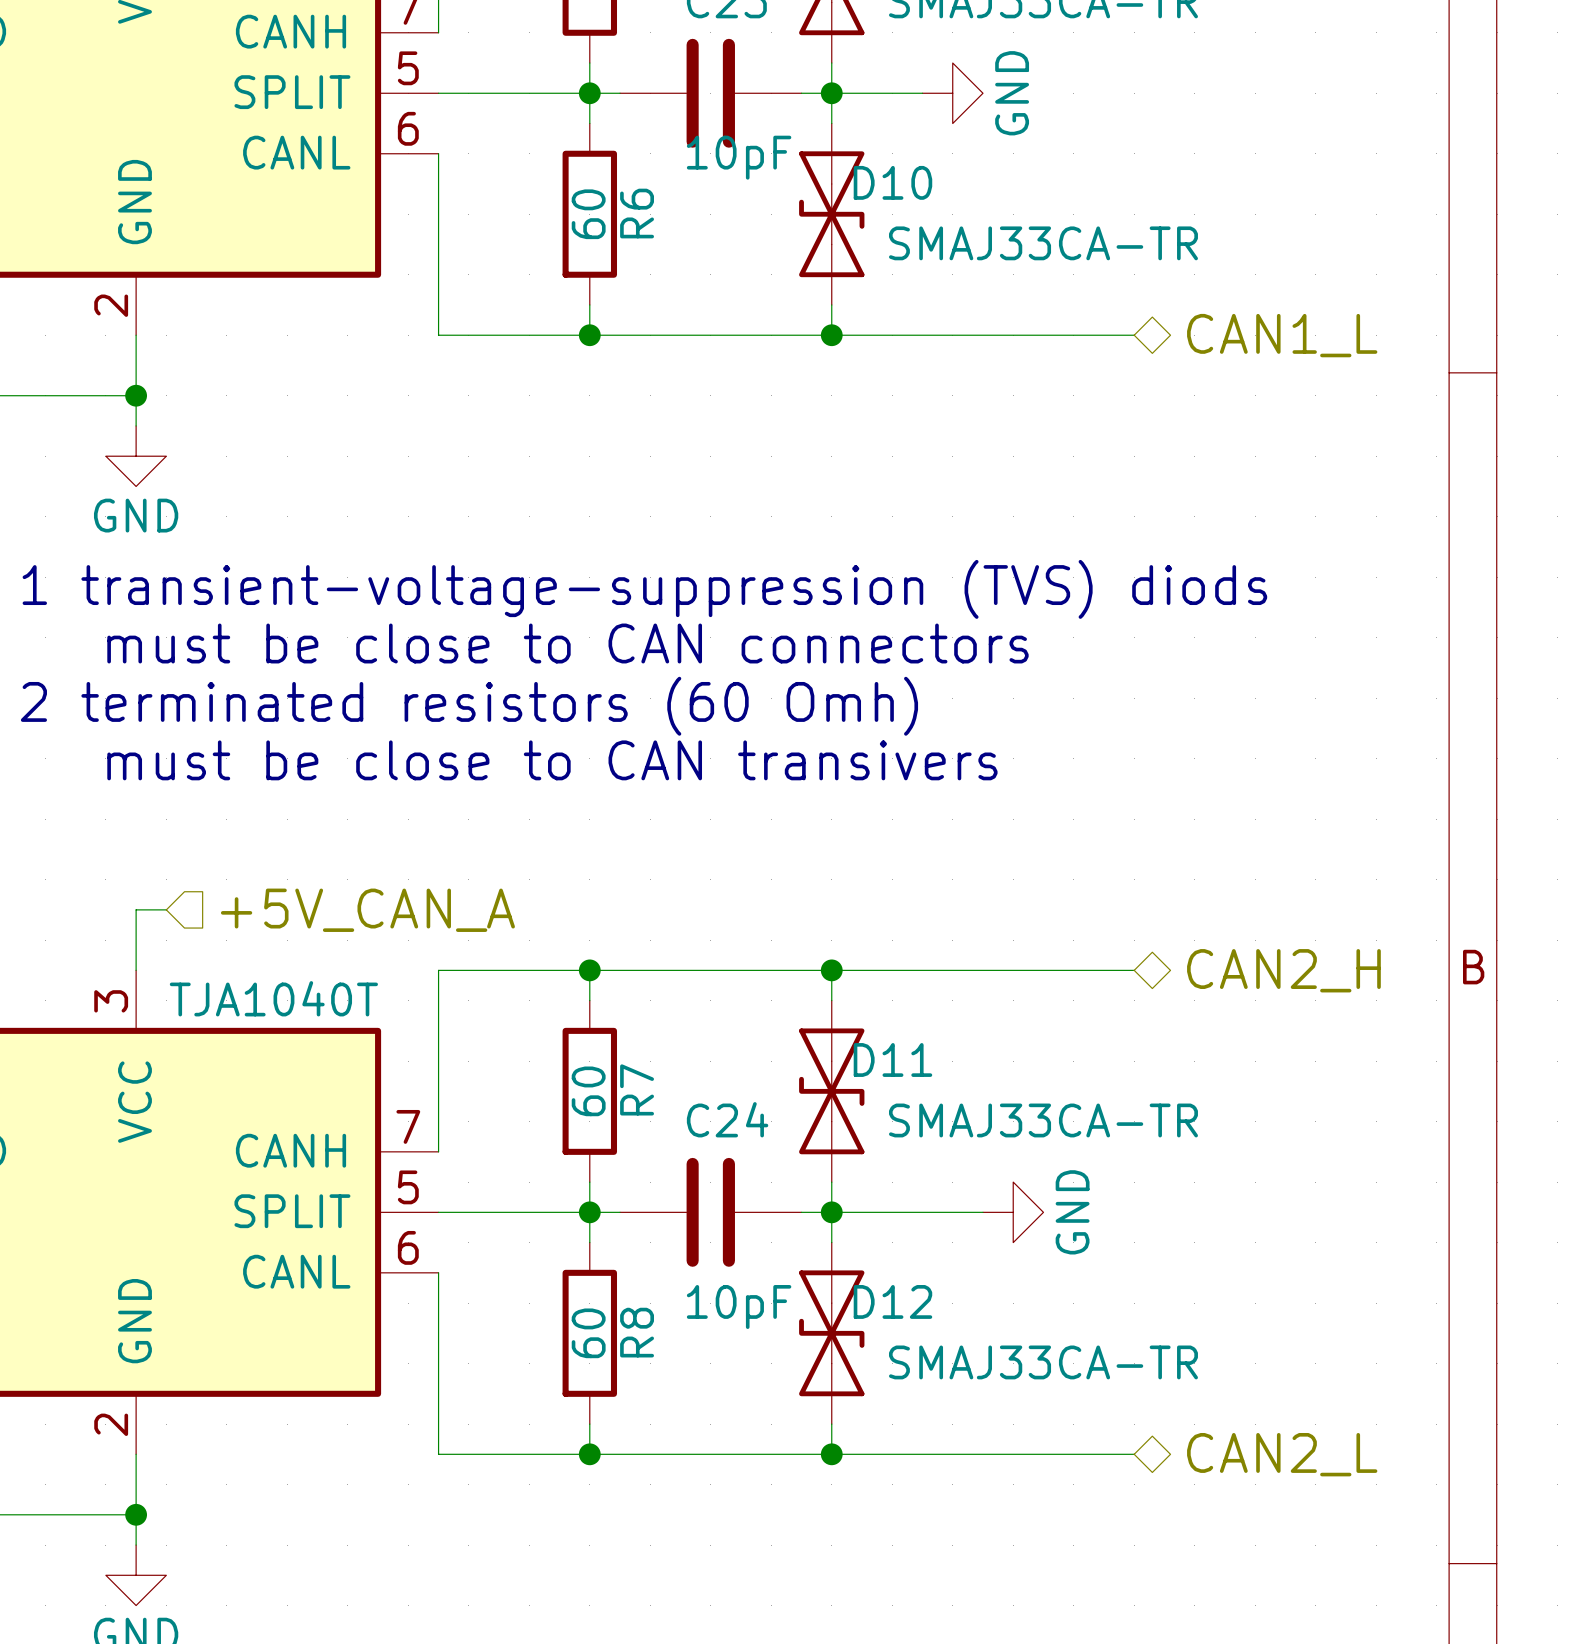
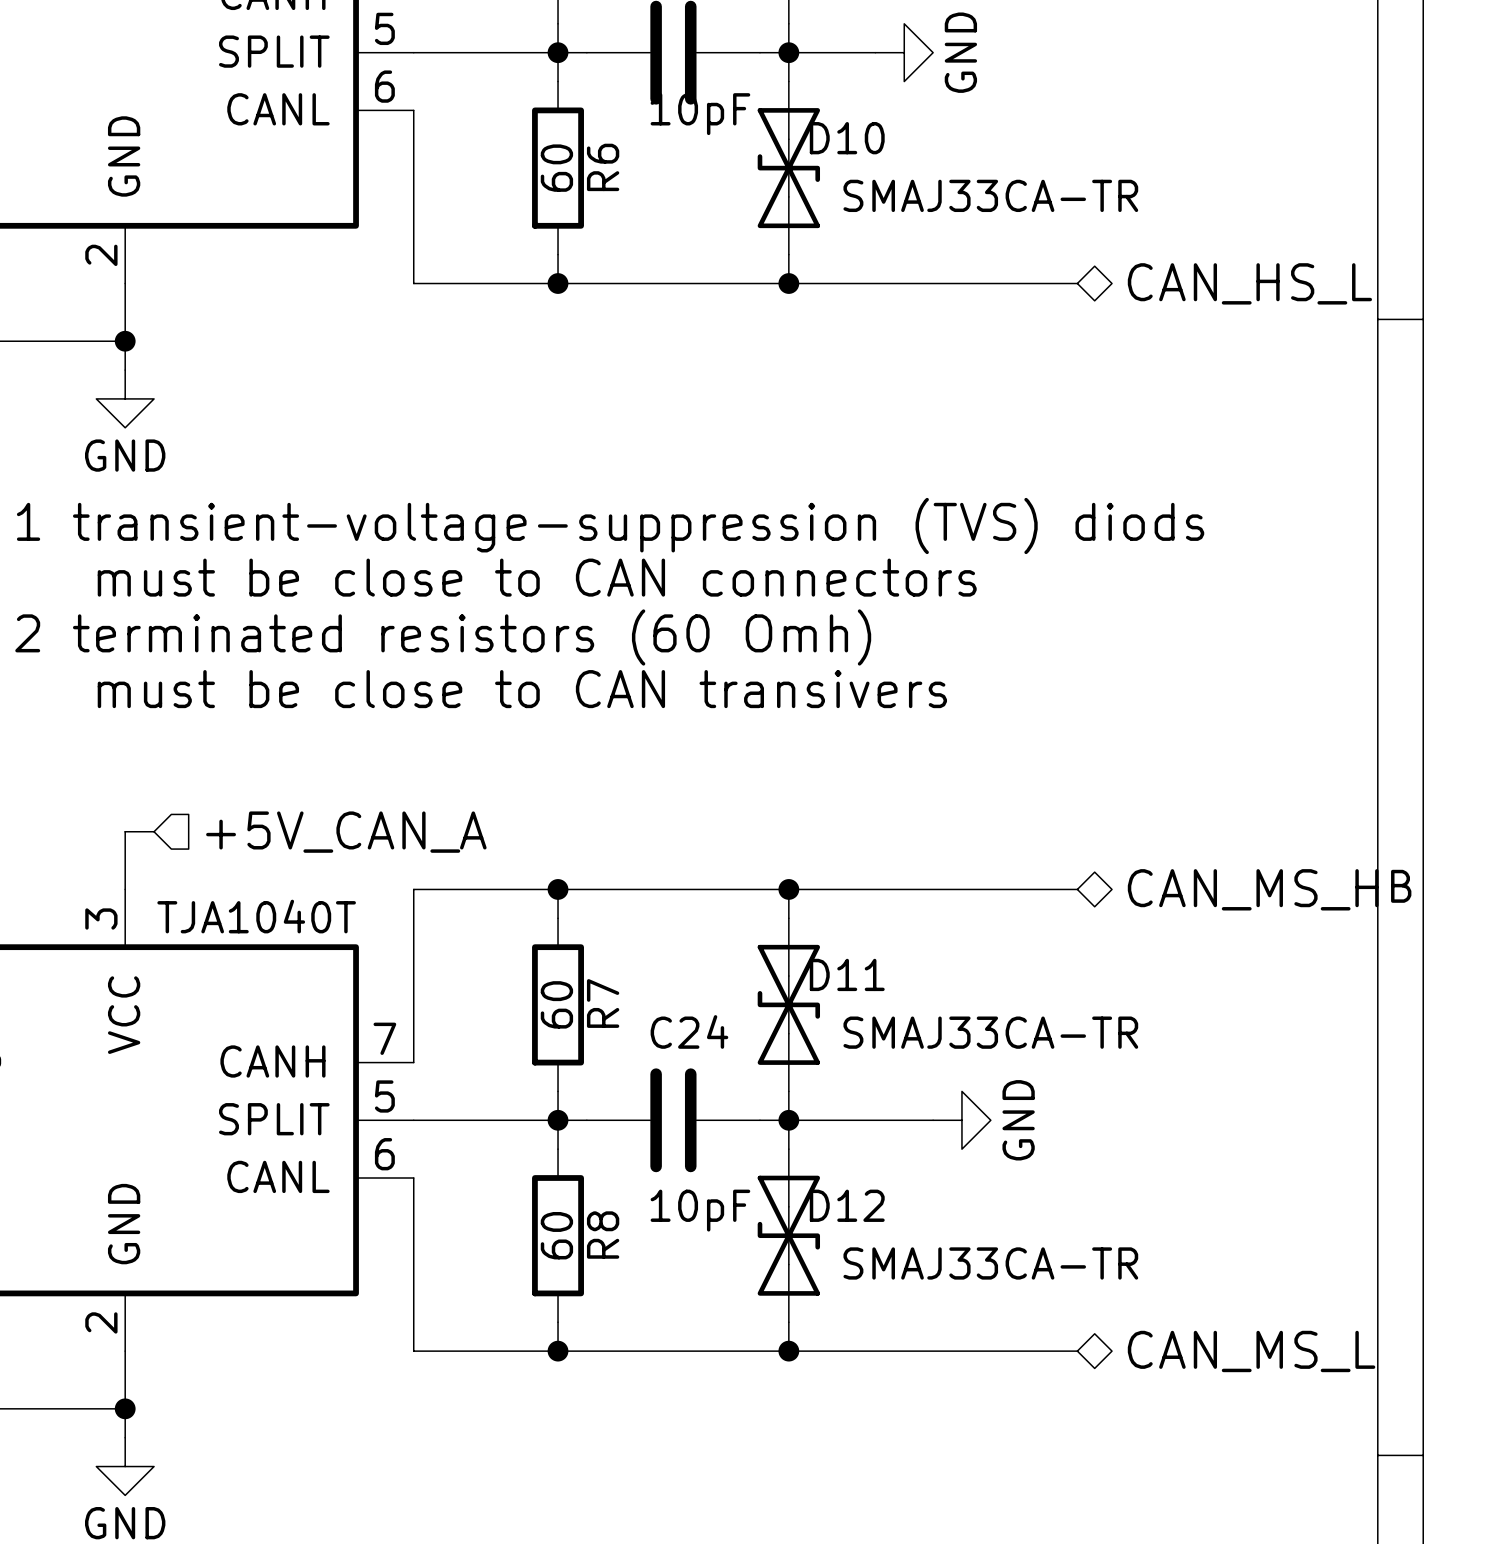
hierarchical label: CAN1_L (1282, 335) -> CAN_HS_L (1249, 283)
hierarchical label: CAN2_H (1283, 970) -> CAN_MS_H (1253, 889)
hierarchical label: CAN2_L (1282, 1454) -> CAN_MS_L (1251, 1351)

